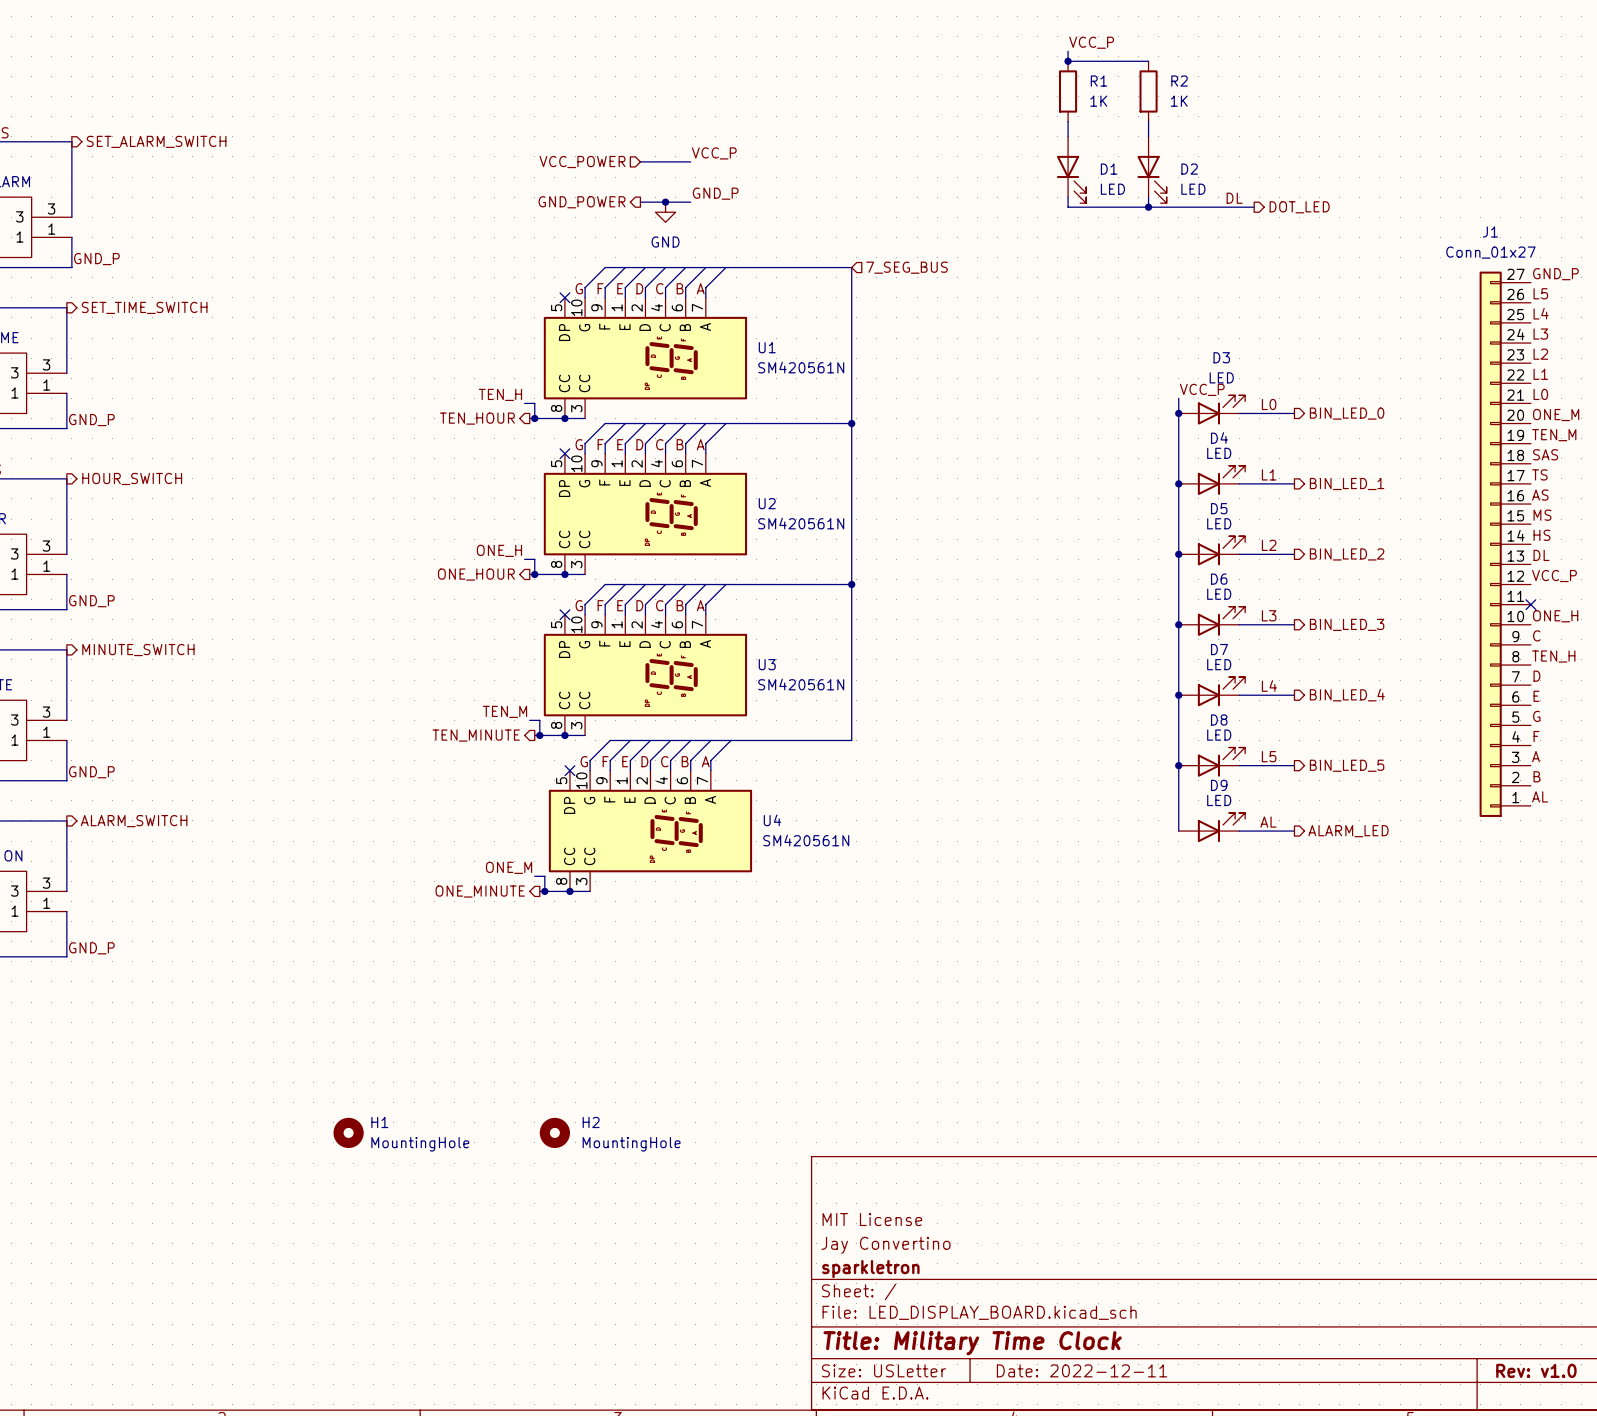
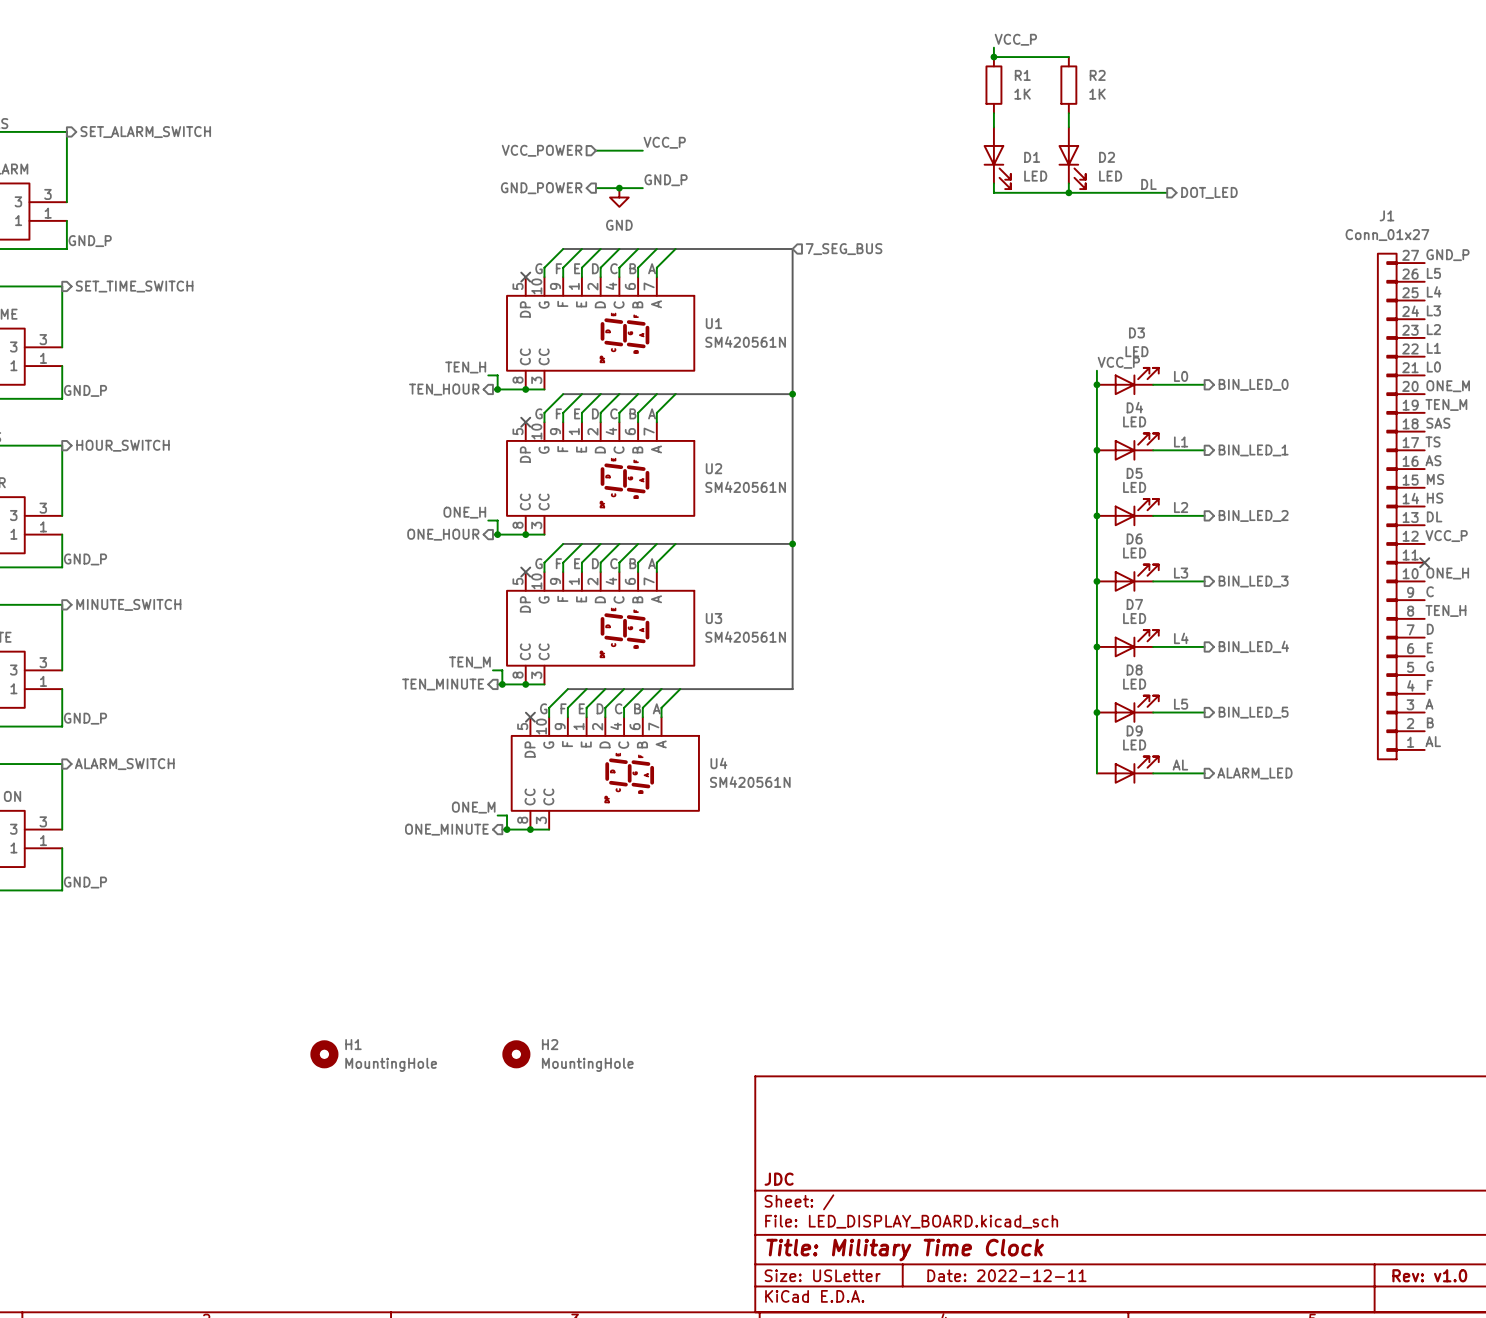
title block: MIT License (872, 1219) -> none
title block: Jay Convertino (885, 1245) -> none
title block: sparkletron (870, 1269) -> JDC (779, 1179)

